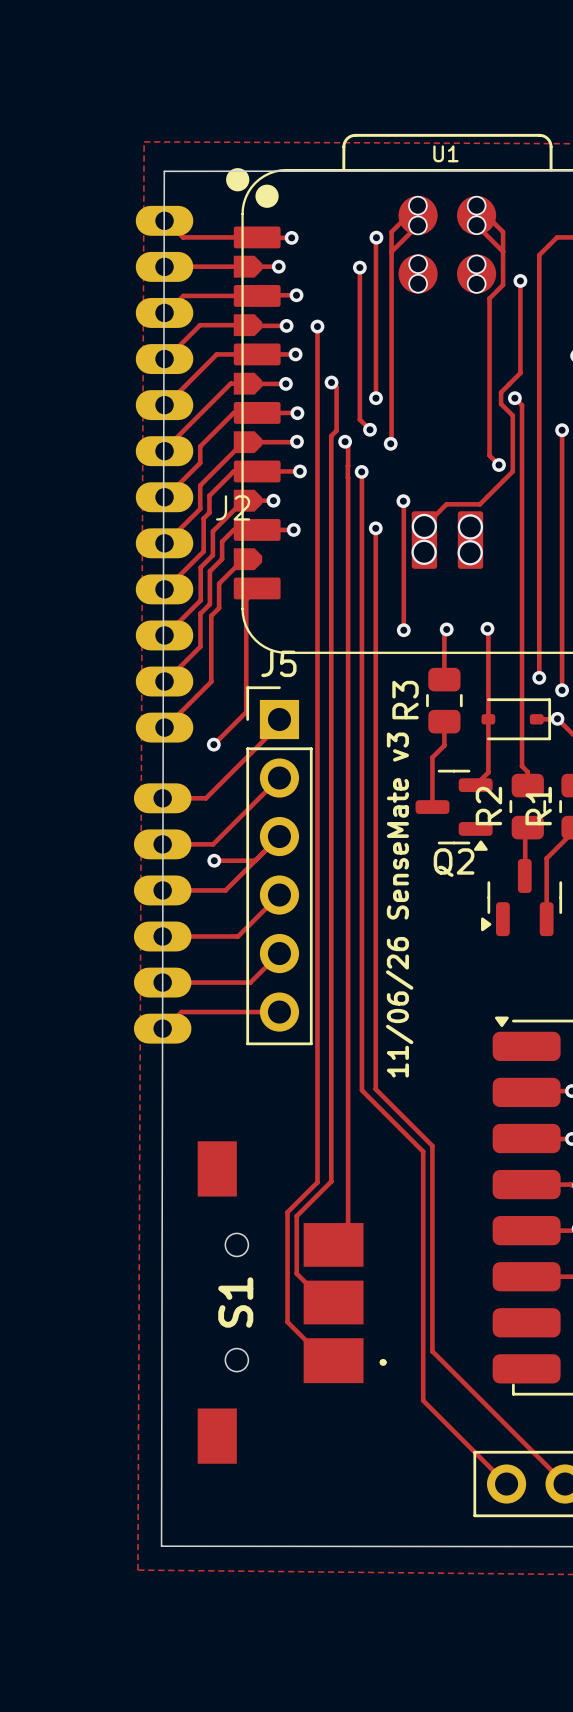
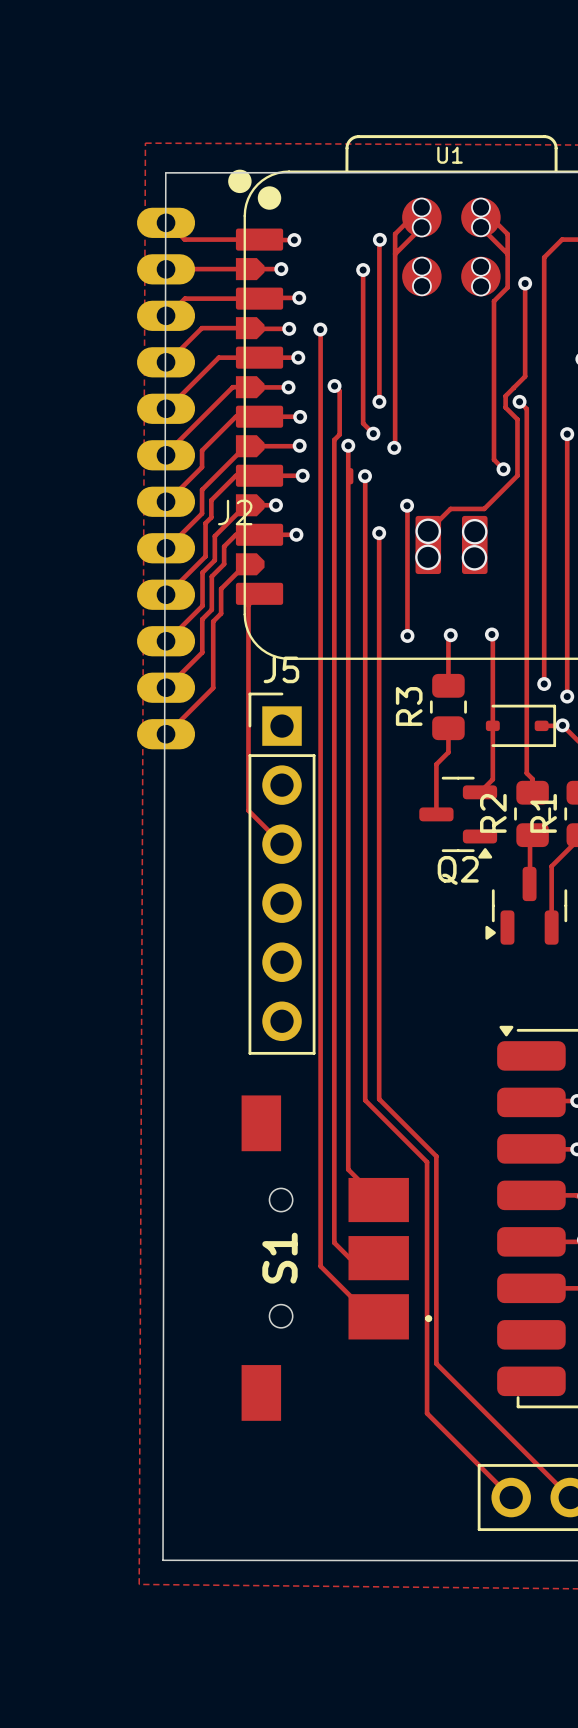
track: (317, 326) (317, 1182) (287, 1212) (287, 1322) (326, 1360) (333, 1360) -> (320, 329) (320, 1266) (371, 1316) (378, 1316)
track: (345, 441) (348, 444) (348, 465) -> (348, 445) (348, 1169) (378, 1200)
track: (348, 477) (348, 1230) (333, 1244) -> none
track: (246, 712) (213, 744) -> (248, 718) (248, 810) (282, 844)
track: (279, 719) (279, 724) (205, 798) (165, 798) -> none
via: (213, 744) -> none
track: (279, 778) (213, 844) (165, 844) -> none
track: (279, 836) (225, 890) (165, 890) -> none
track: (214, 860) (255, 860) -> none
via: (214, 860) -> none
track: (279, 895) (238, 936) (165, 936) -> none
text: 11/06/26 SenseMate v3 (399, 905) -> none
part: (162, 913) -> none
track: (279, 953) (250, 982) (164, 982) -> none
track: (279, 1012) (181, 1012) (164, 1028) -> none
track: (331, 1181) (296, 1216) (296, 1273) (325, 1302) (333, 1302) -> (334, 1192) (334, 1242) (349, 1258) (378, 1258)
S1 position: (292, 1302) -> (336, 1258)

